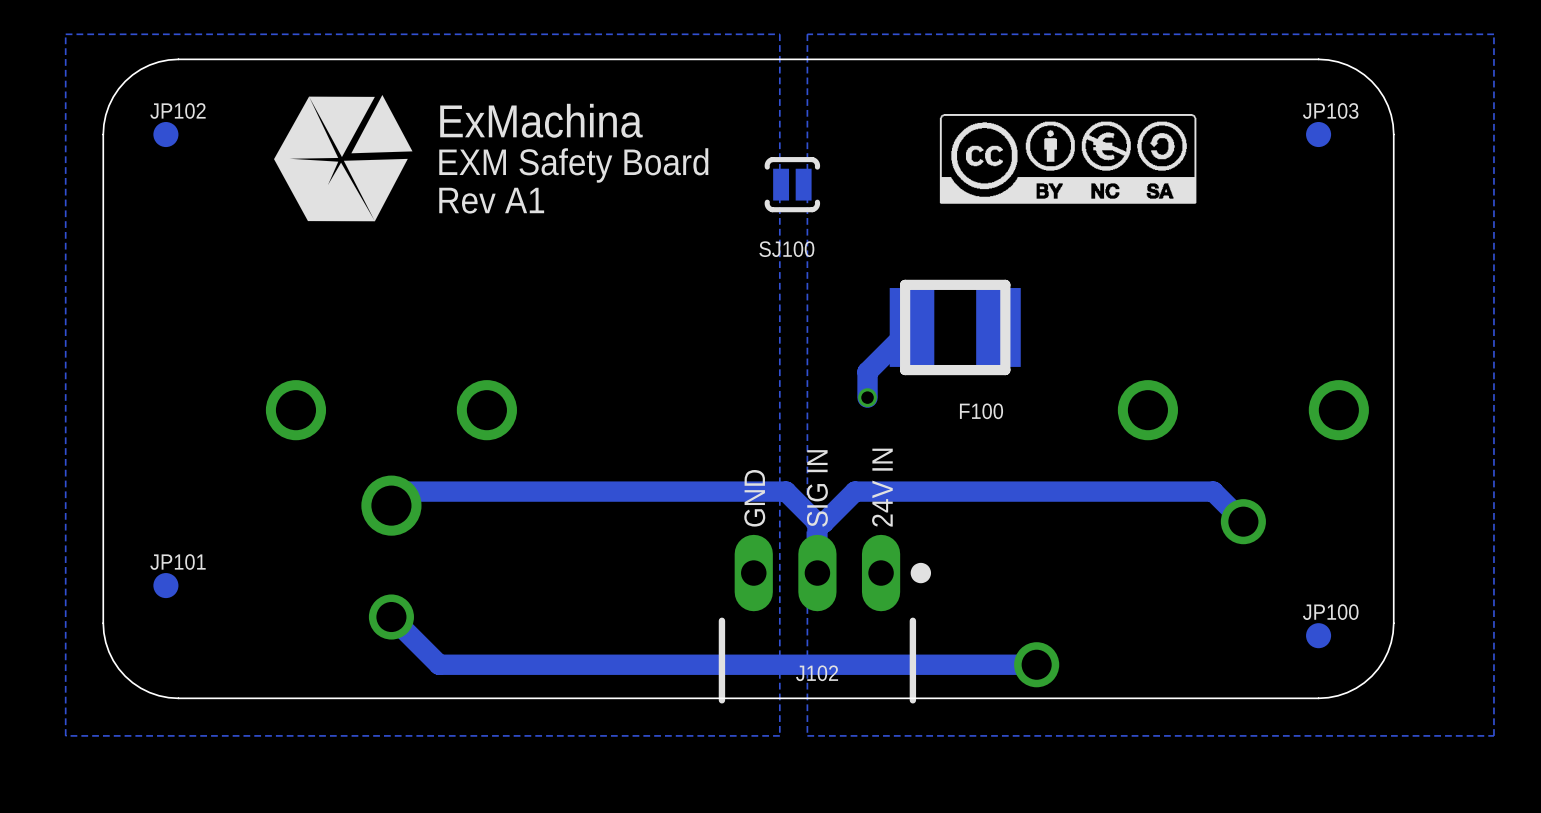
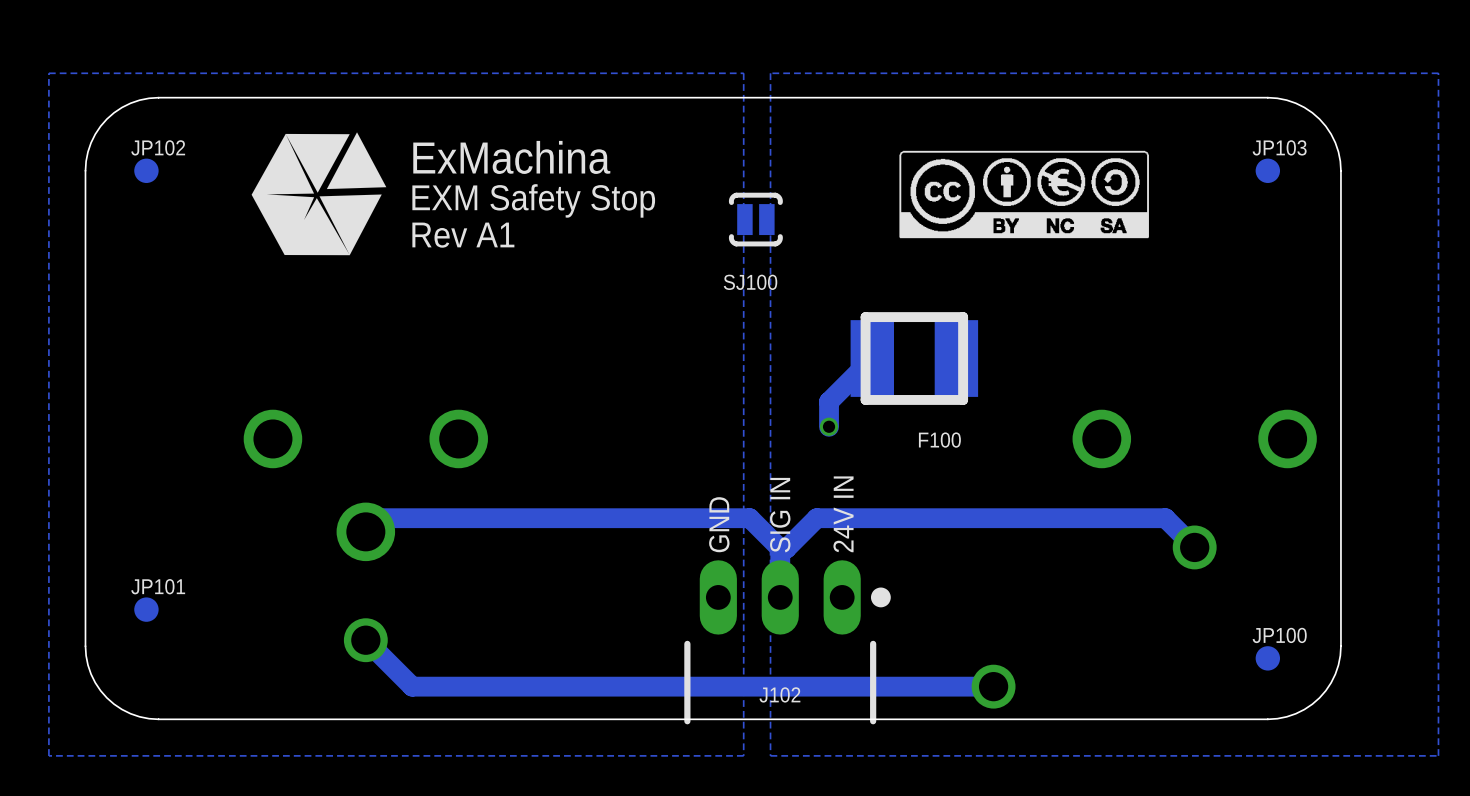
text: EXM Safety Board (573, 165) -> EXM Safety Stop (533, 200)

